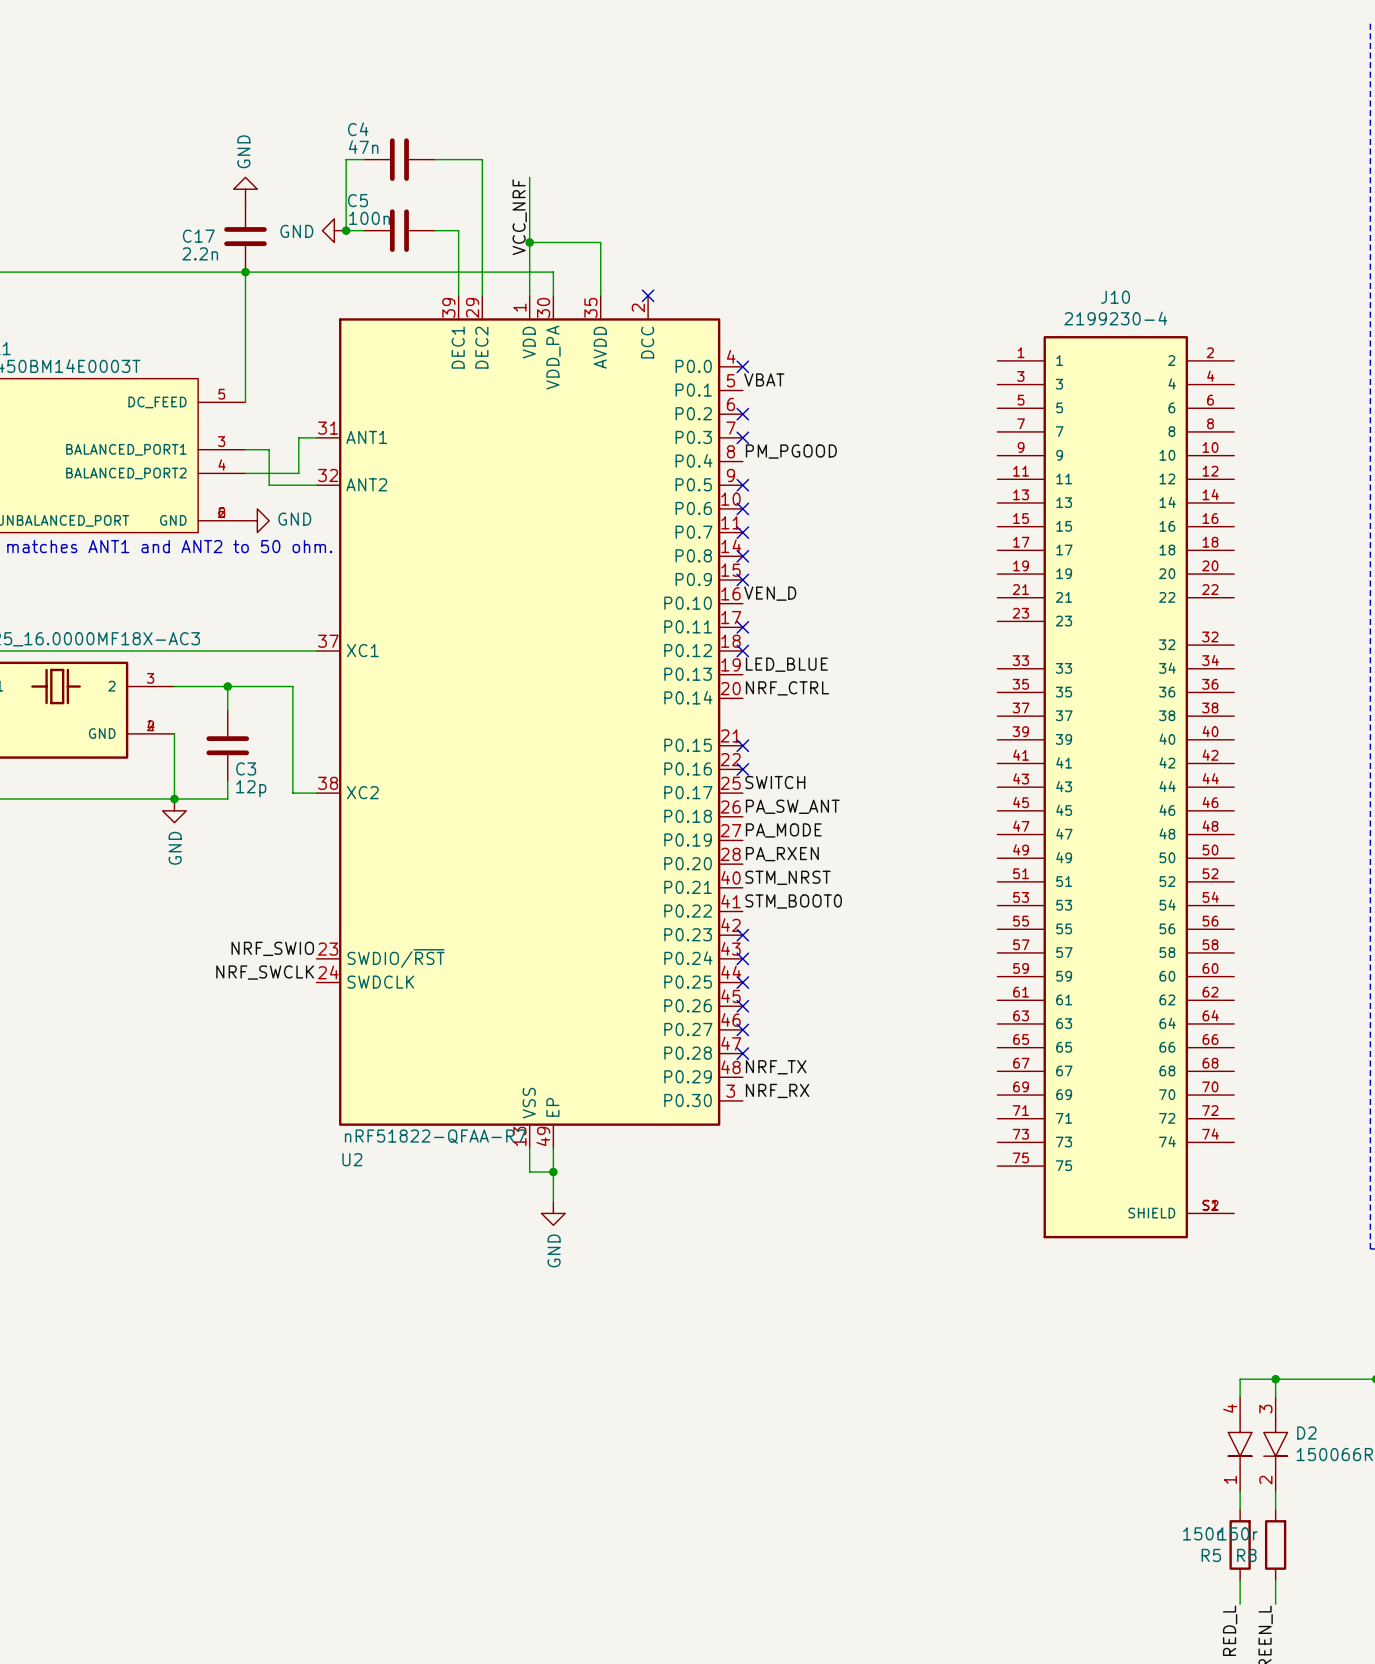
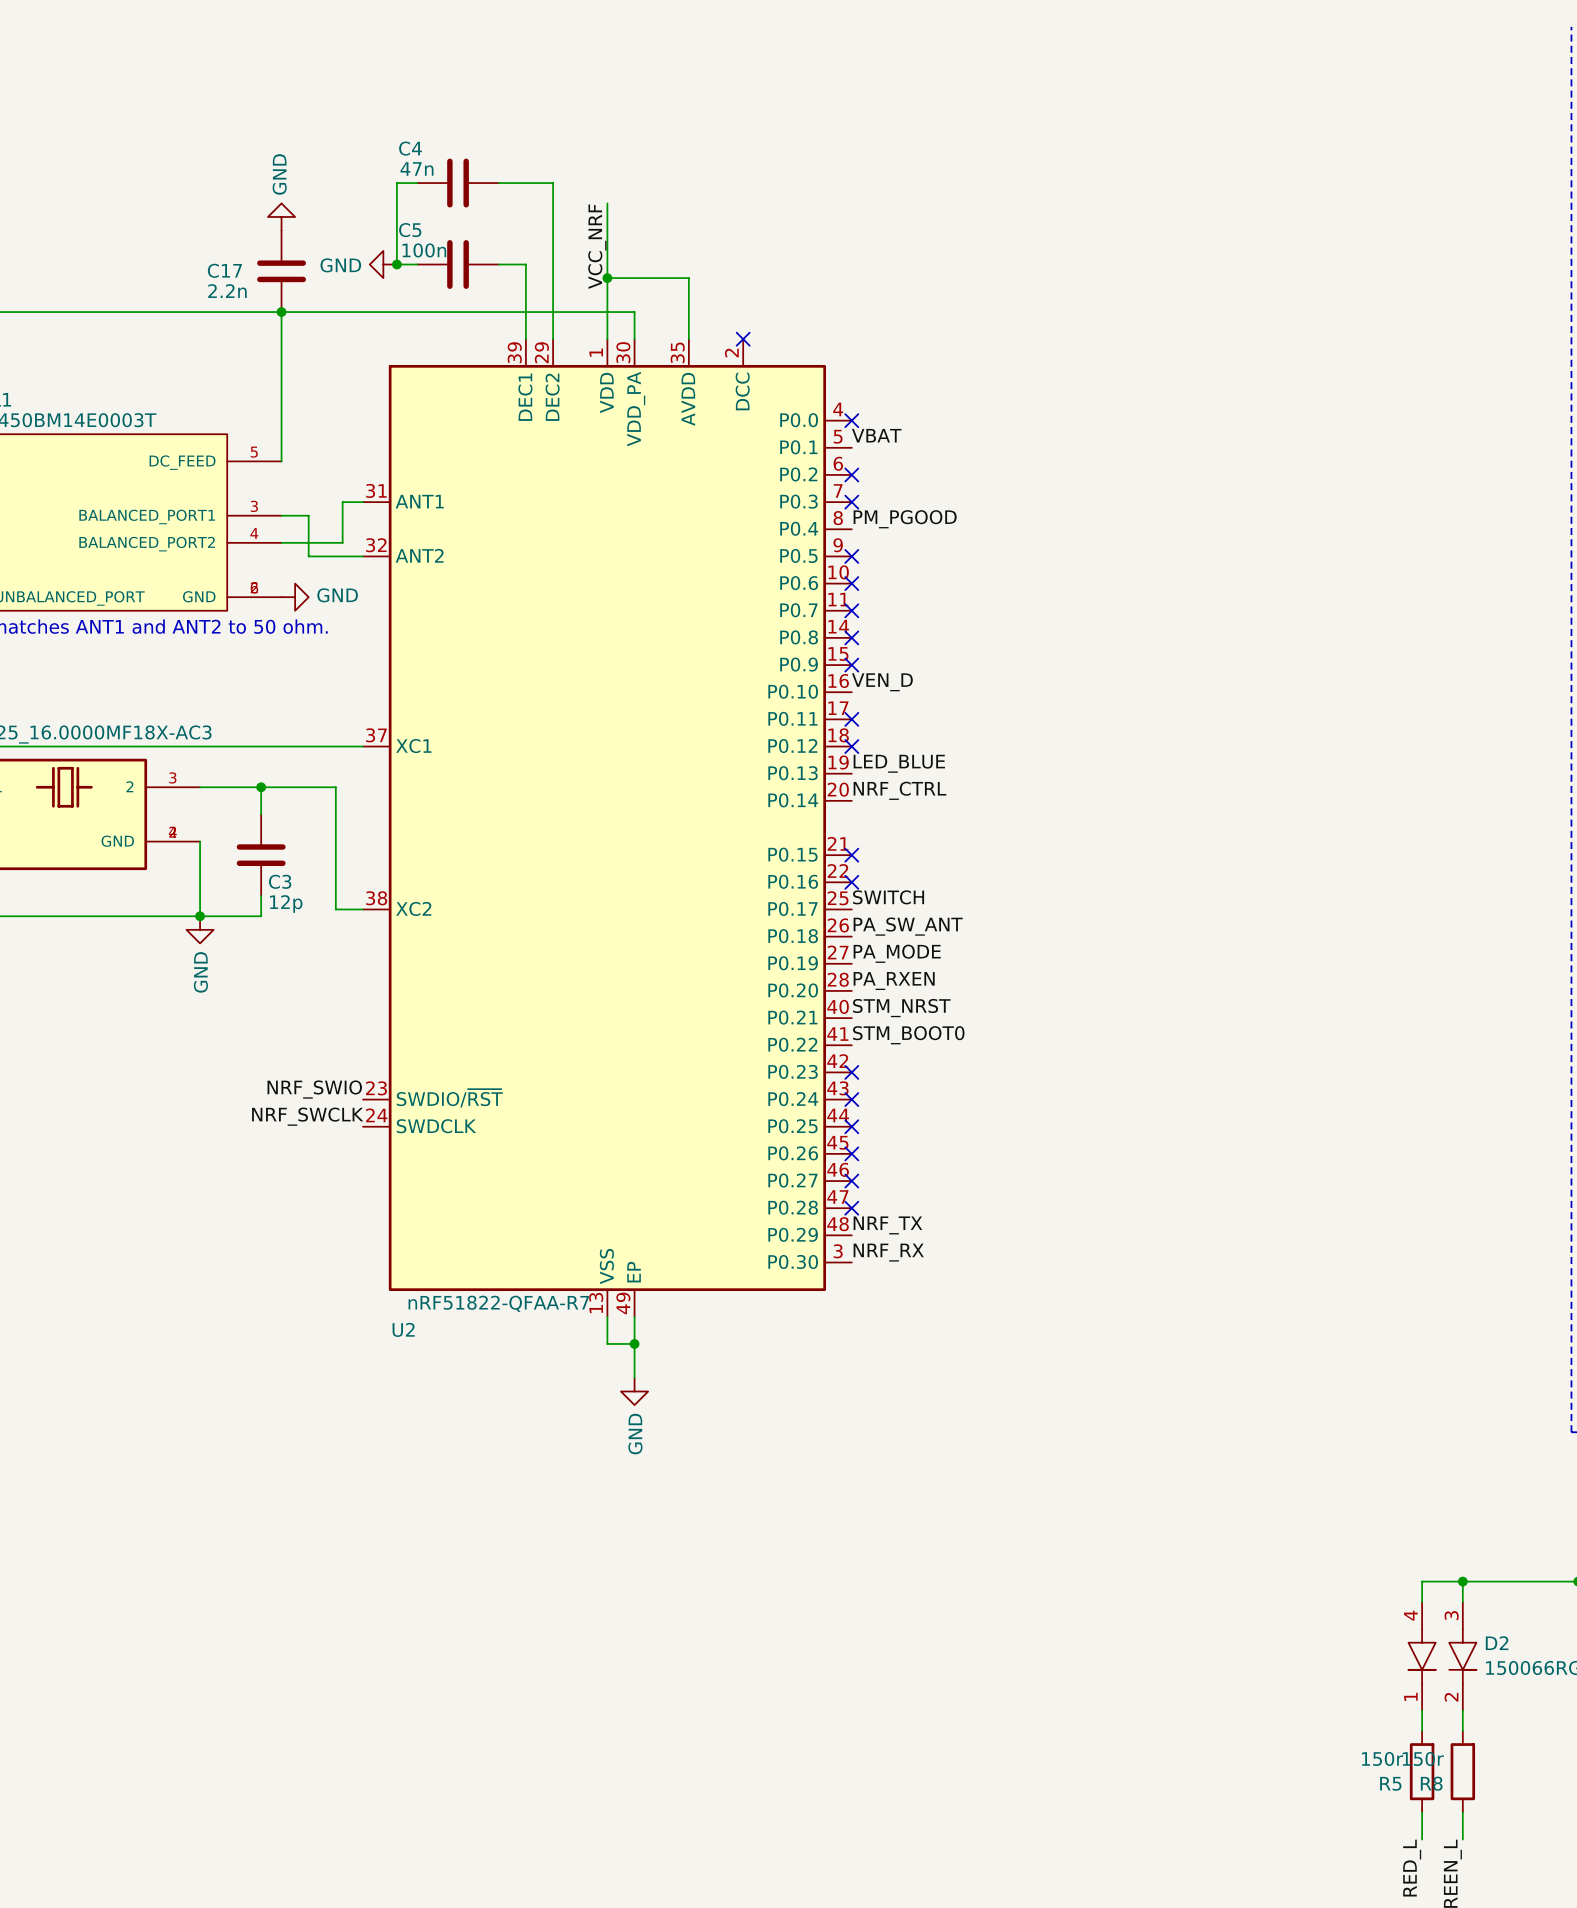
J10: 2199230-4 (1115, 787) -> none

